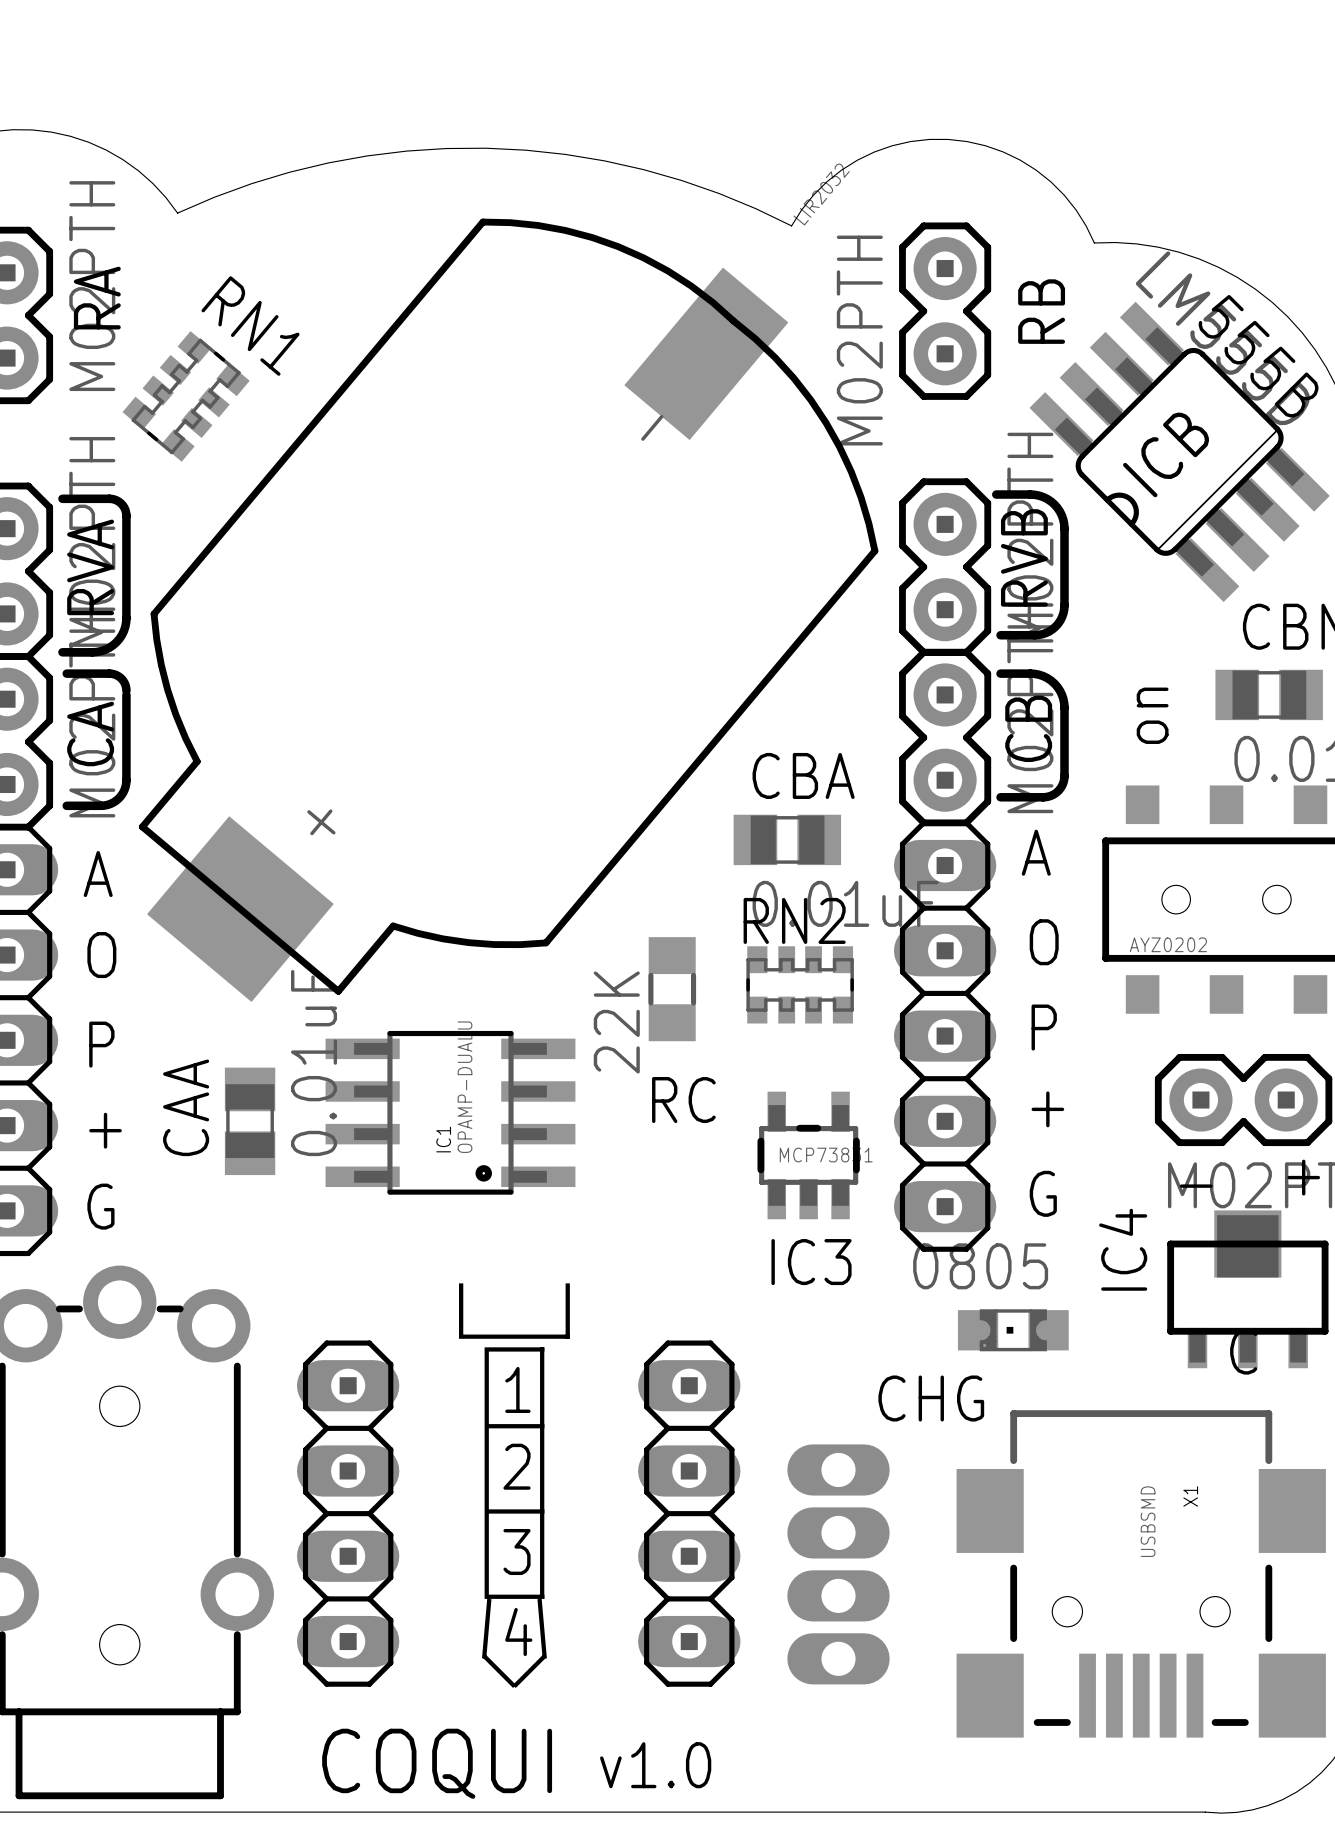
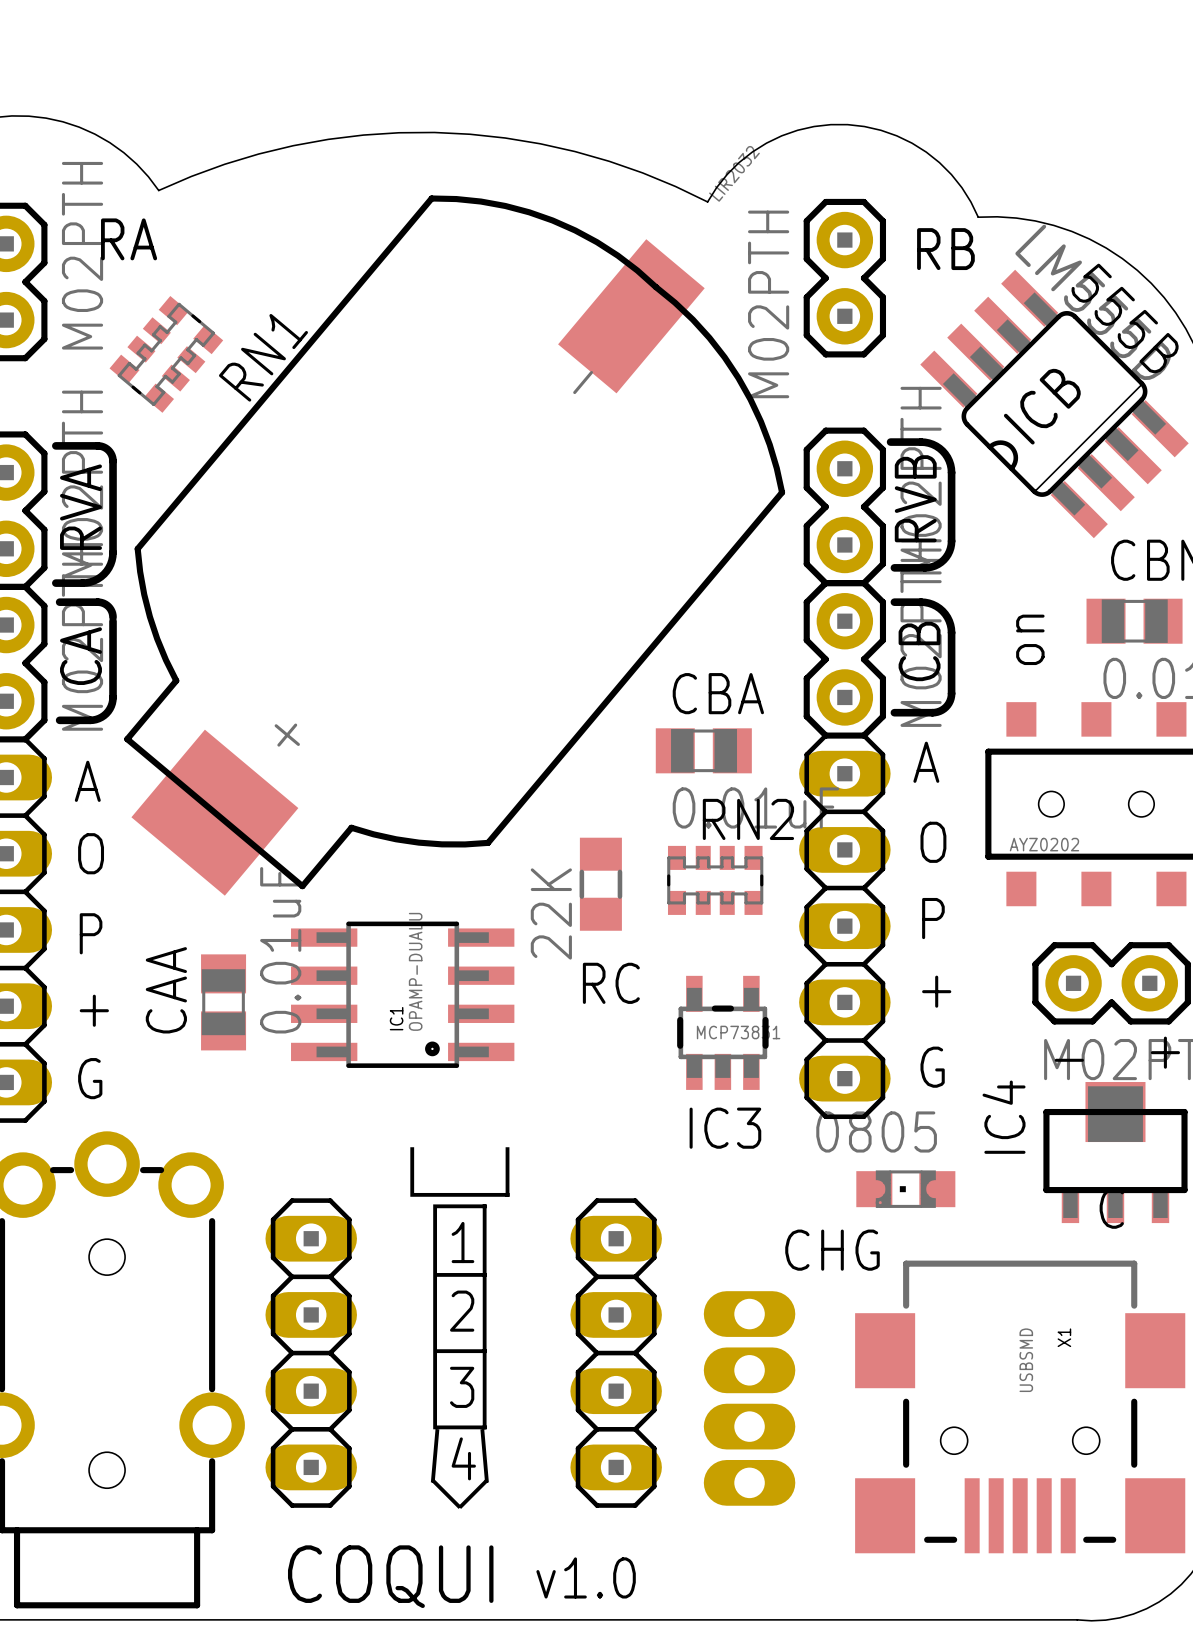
RA name rotation: 0° (97, 298) -> 90° clockwise (129, 239)
RB name rotation: 0° (1041, 311) -> 90° clockwise (945, 249)
RN1 name rotation: 0° (250, 326) -> 90° counterclockwise (263, 357)
RN2 name position: RN2 (794, 920) -> RN2 (748, 819)

